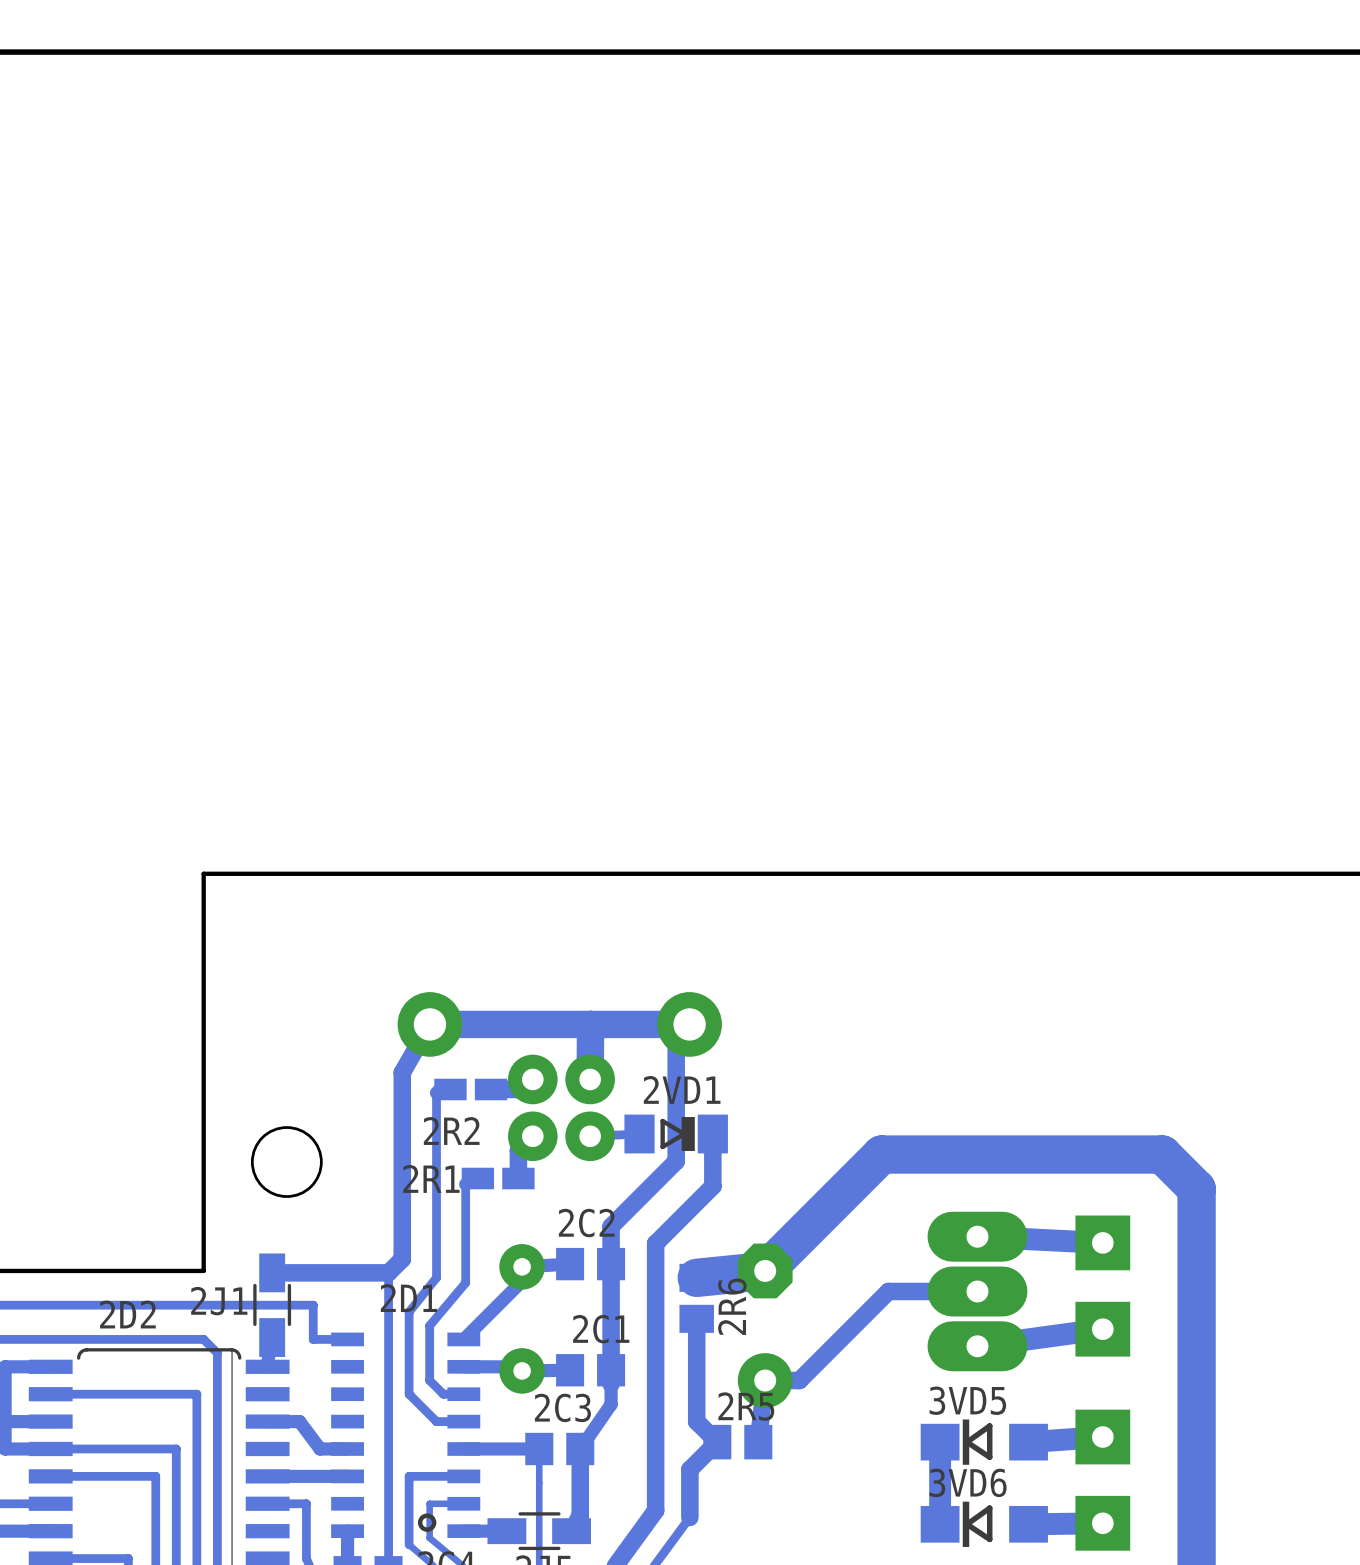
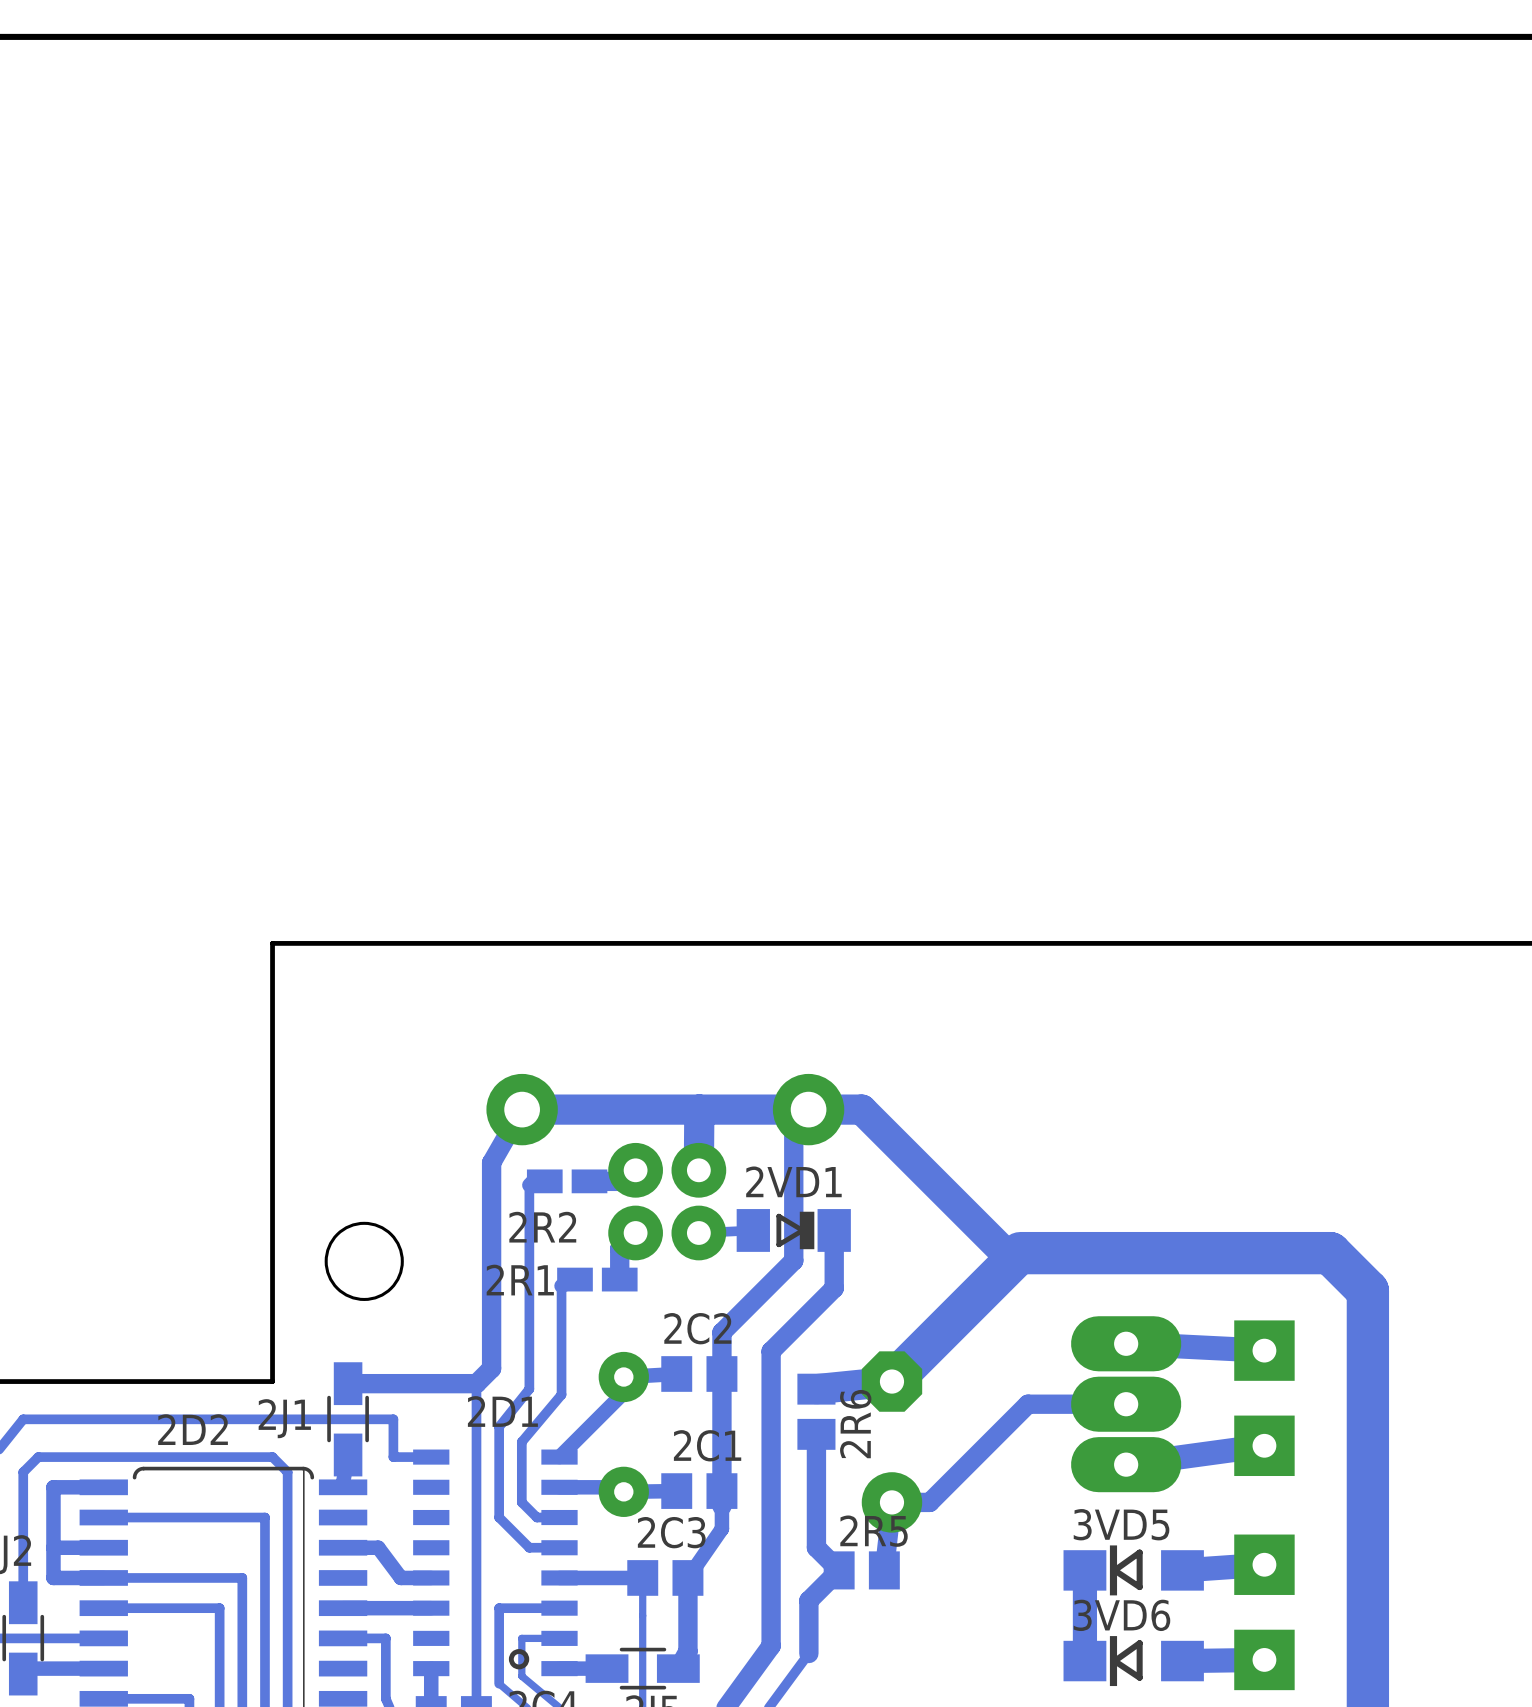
track: none -> (808, 1109) (861, 1109) (1005, 1253) (1020, 1253)
track width: thick (881, 1154) (765, 1270) (696, 1277) -> thin (1020, 1253) (891, 1381) (816, 1389)

